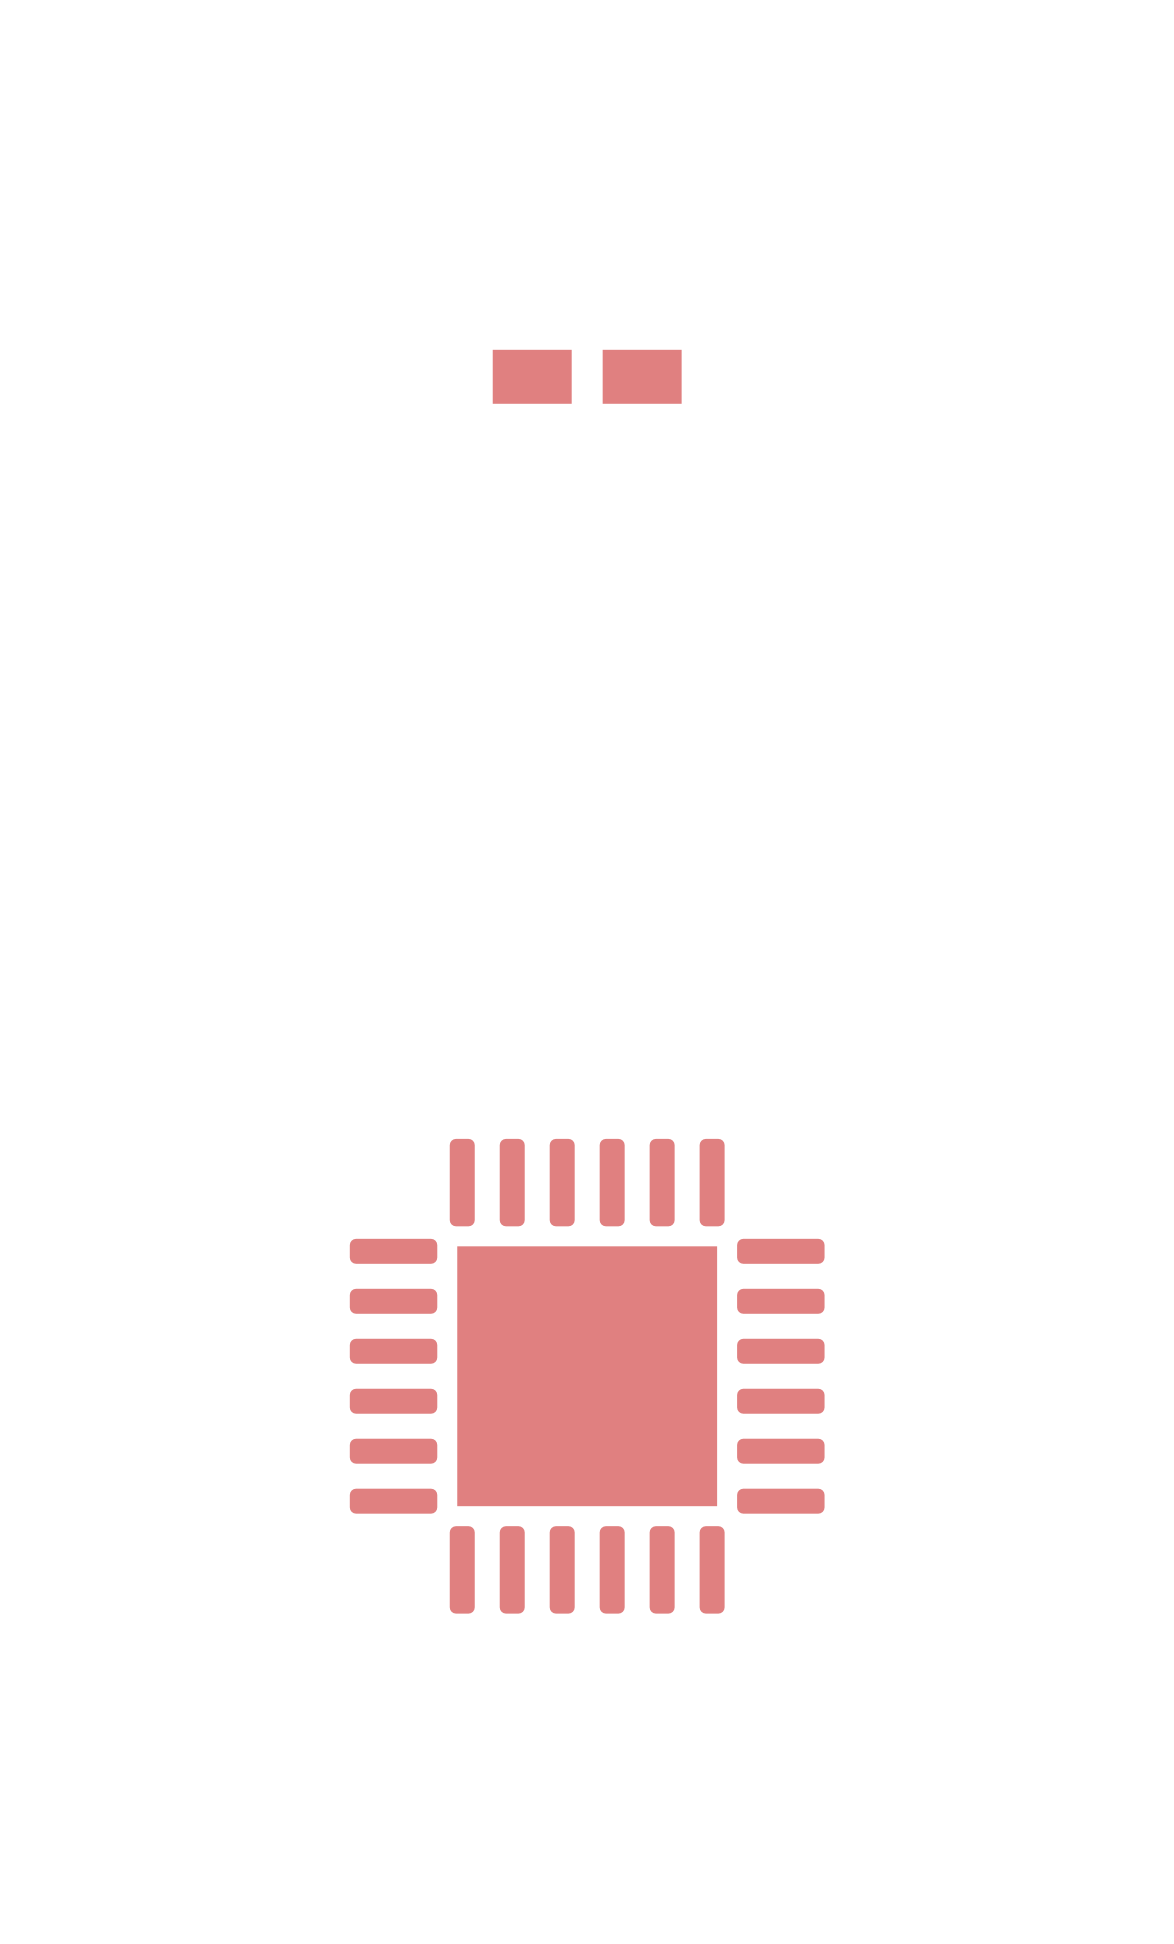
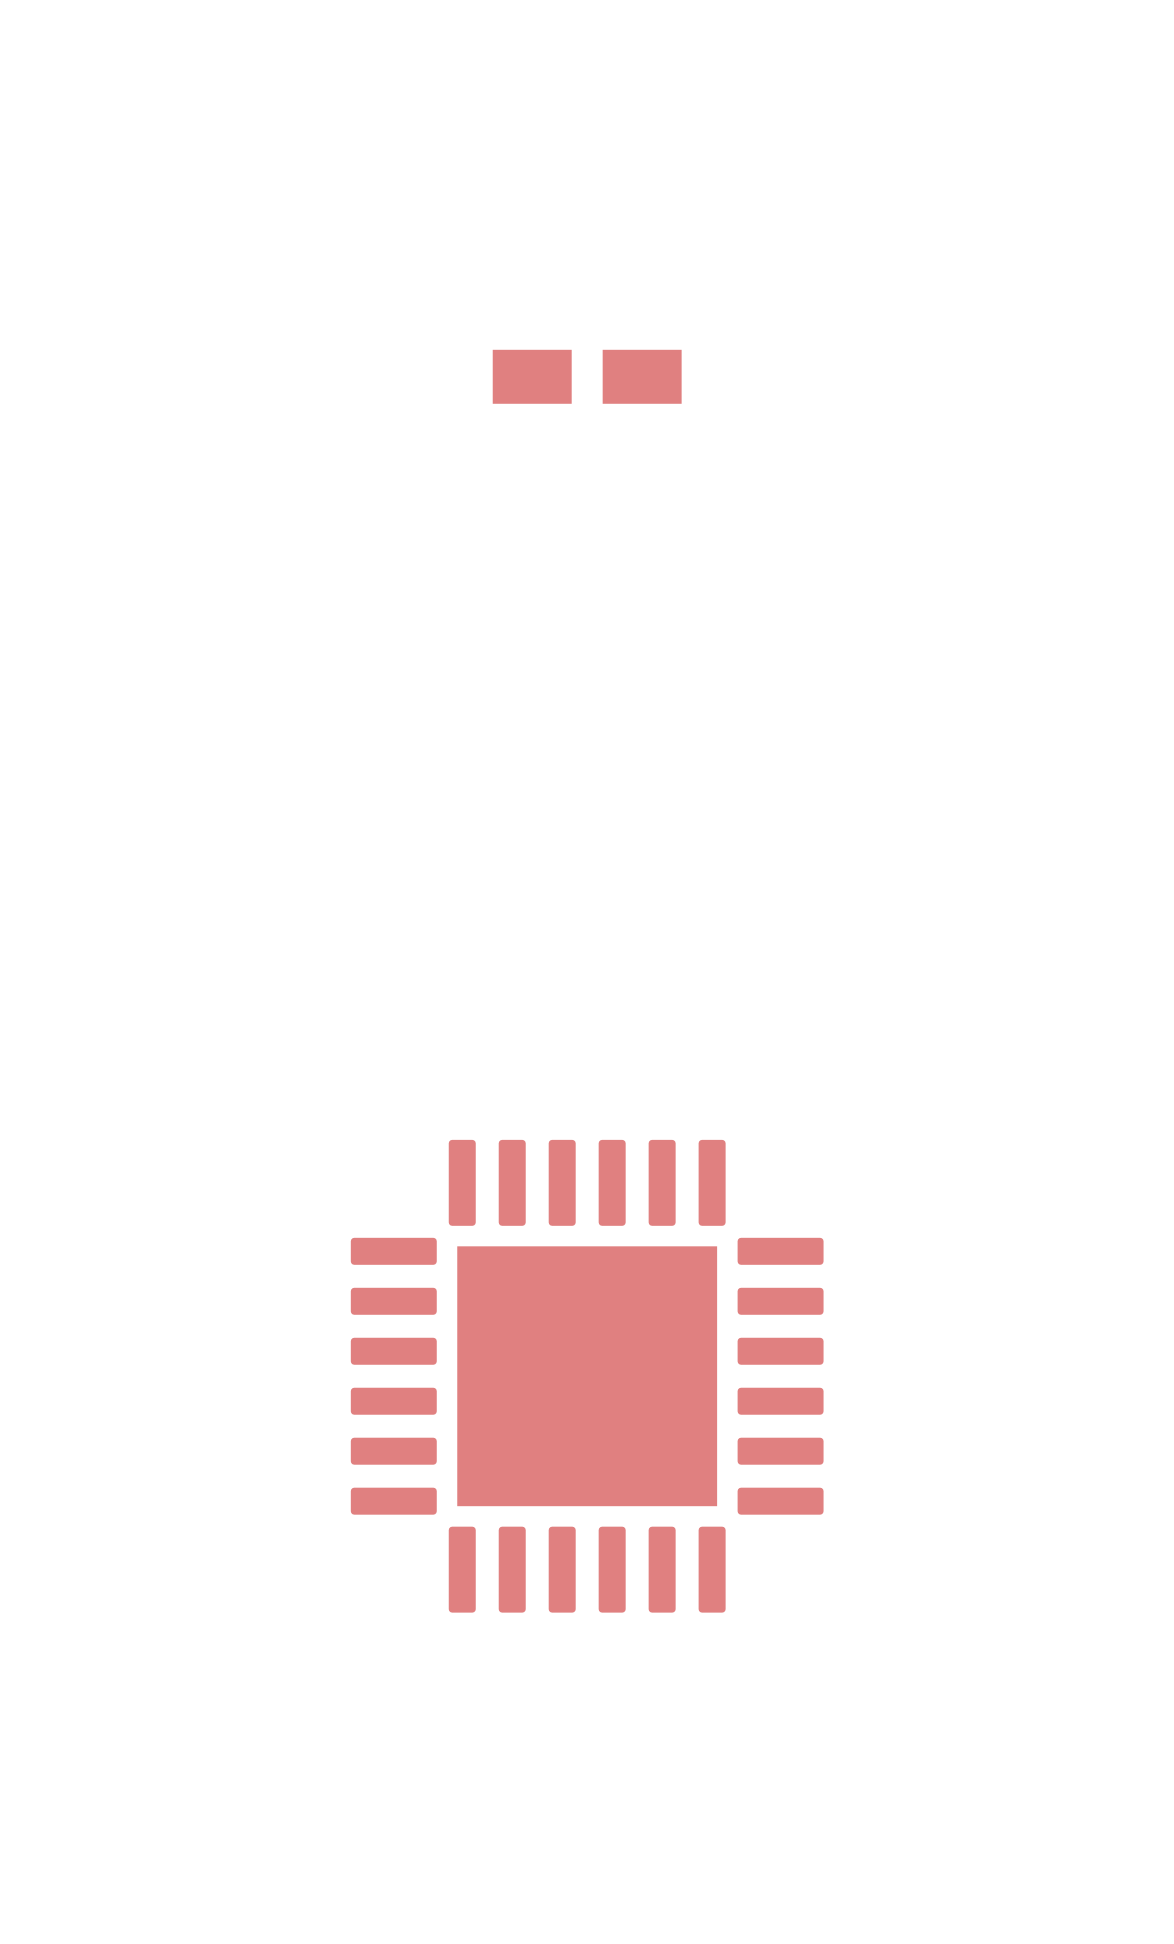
part footprint: [349, 1138, 825, 1614] -> [350, 1139, 824, 1613]

